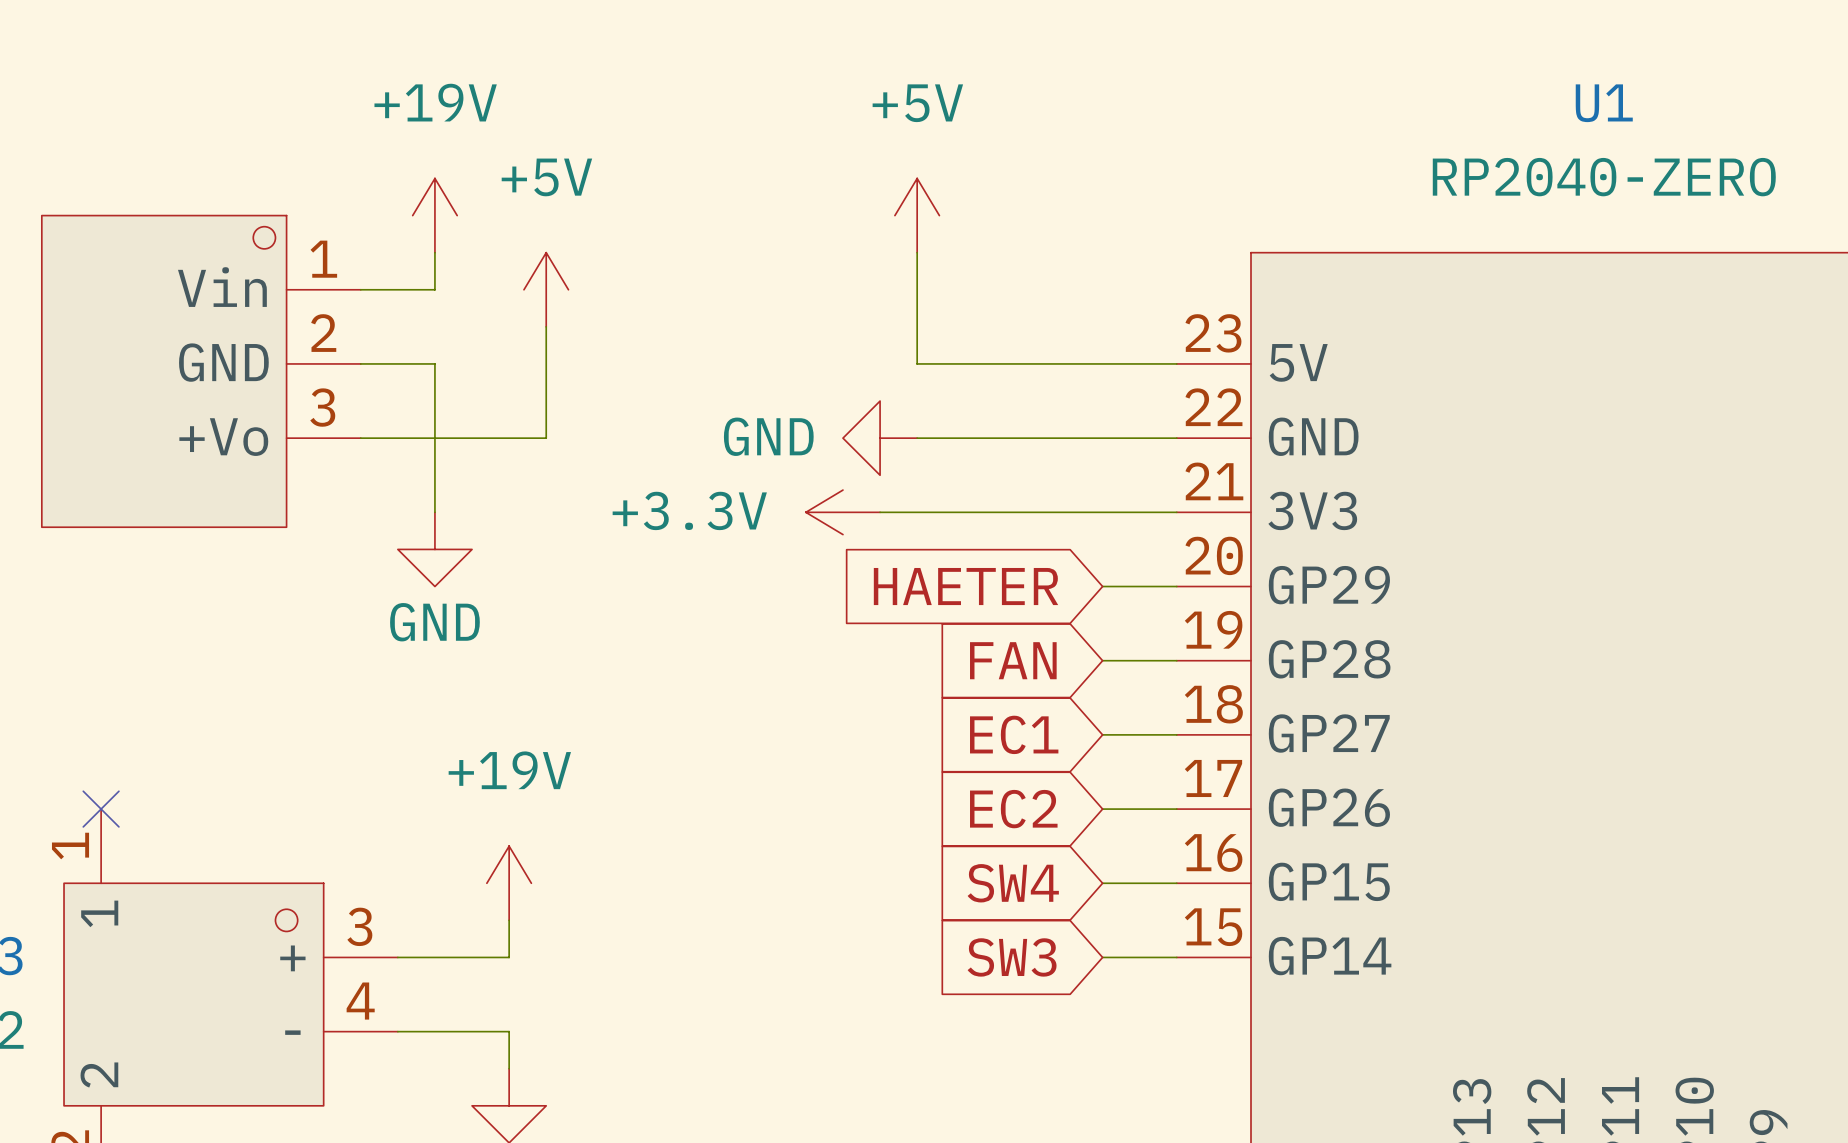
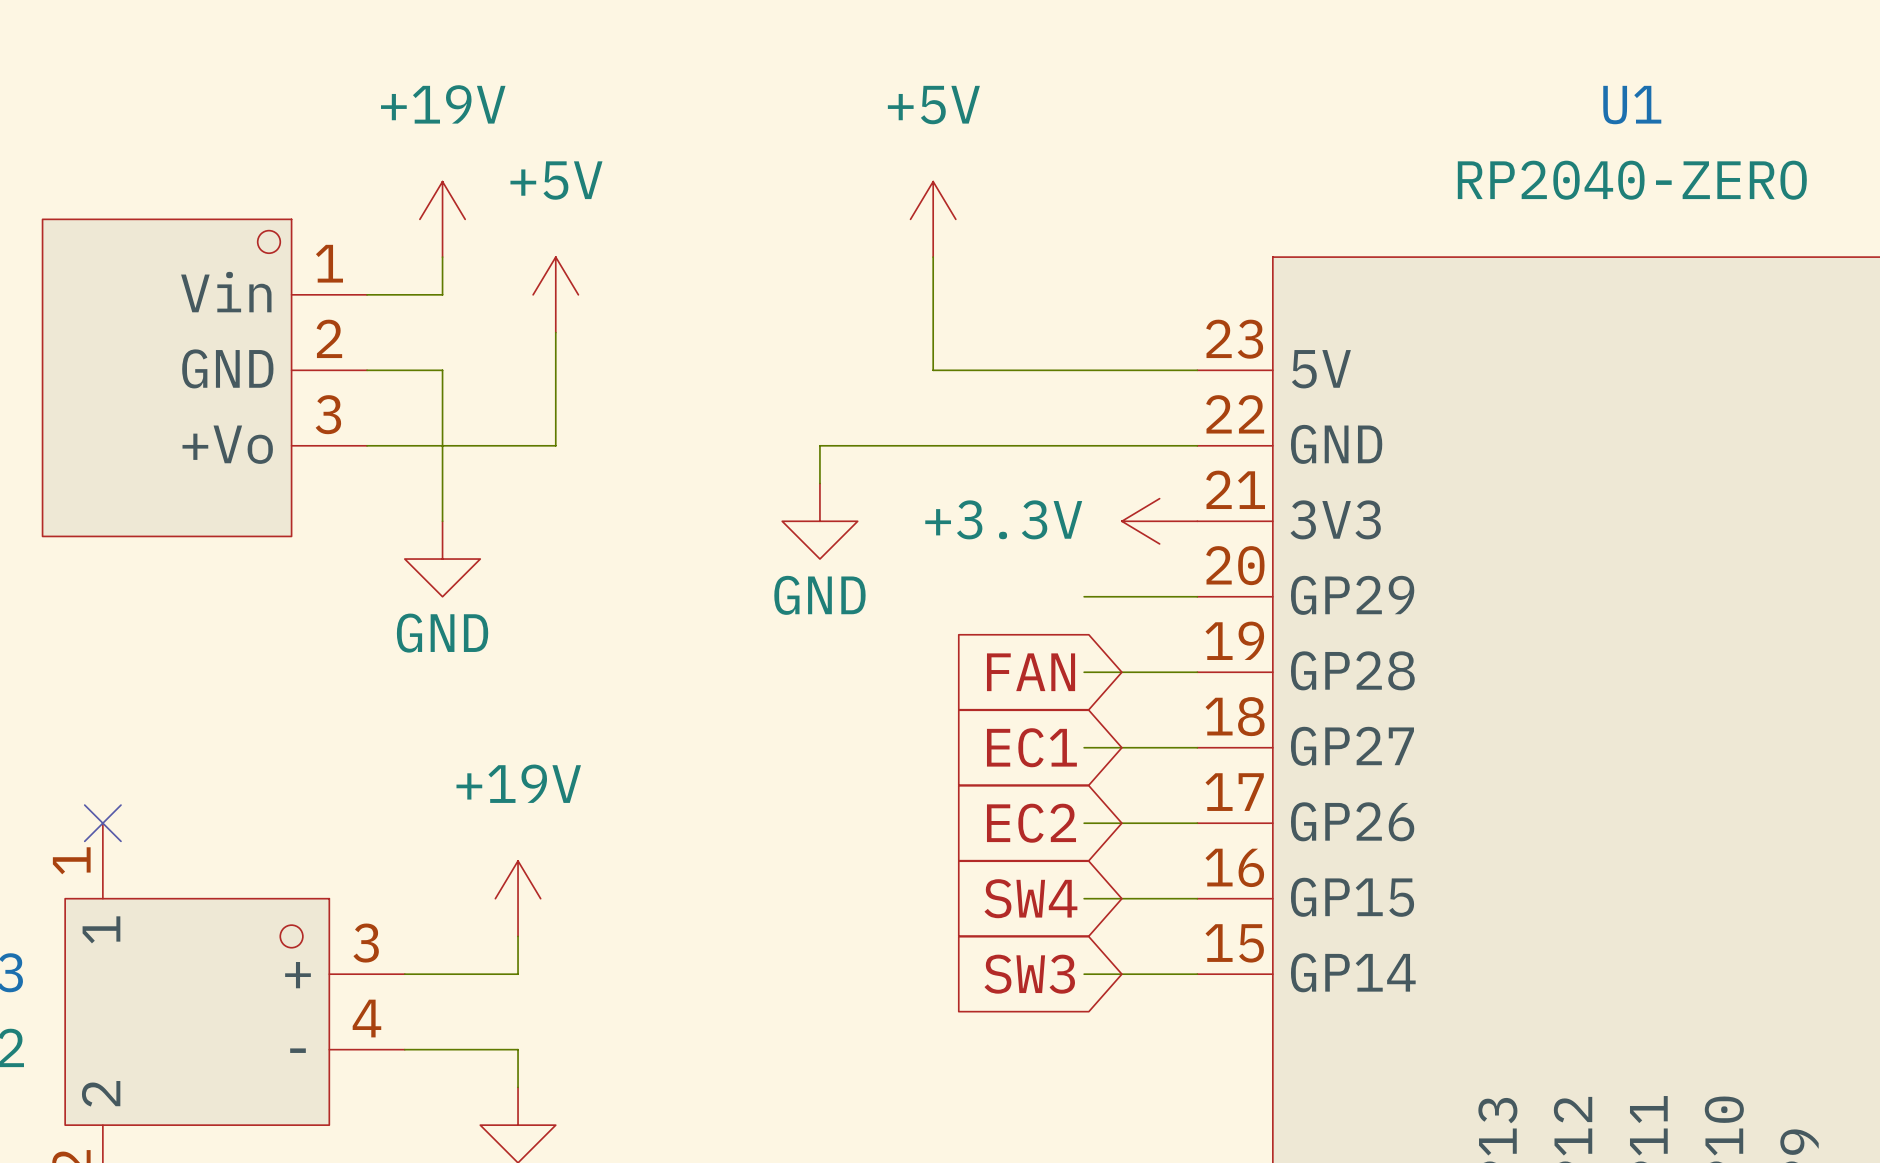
power symbol rotation: 0° (880, 438) -> 90° counterclockwise (819, 521)
power symbol position: GND (880, 438) -> GND (819, 521)
wire: none -> (933, 445) (819, 445) (819, 483)
power symbol position: +3.3V (842, 512) -> +3.3V (1159, 521)
wire: (880, 512) (1176, 512) -> none
global label: HAETER (966, 586) -> none
wire: none -> (1084, 596) (1121, 596)
wire: none -> (1084, 672) (1121, 672)
wire: none -> (1084, 747) (1121, 747)
wire: none -> (1084, 823) (1121, 823)
wire: none -> (1084, 898) (1121, 898)
wire: none -> (1084, 974) (1121, 974)

